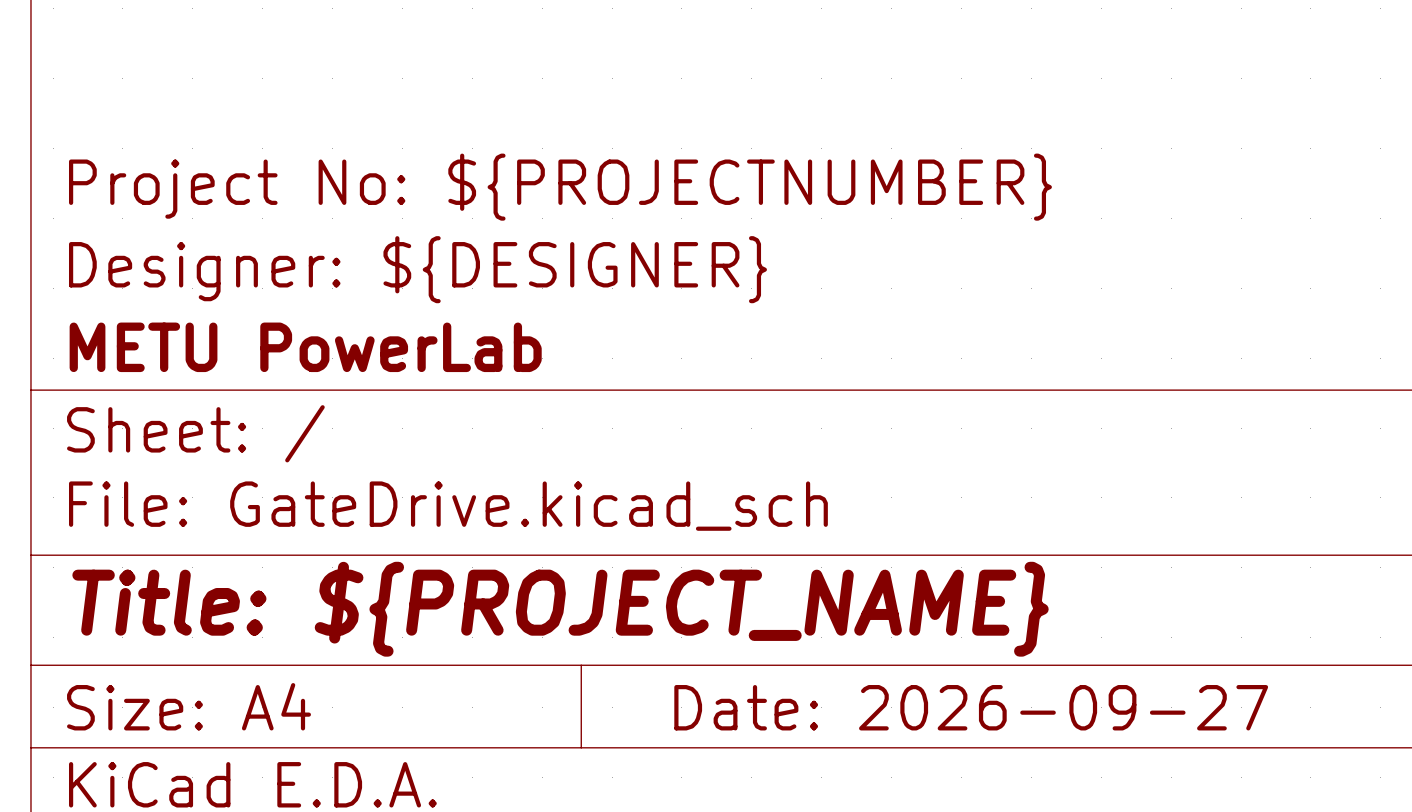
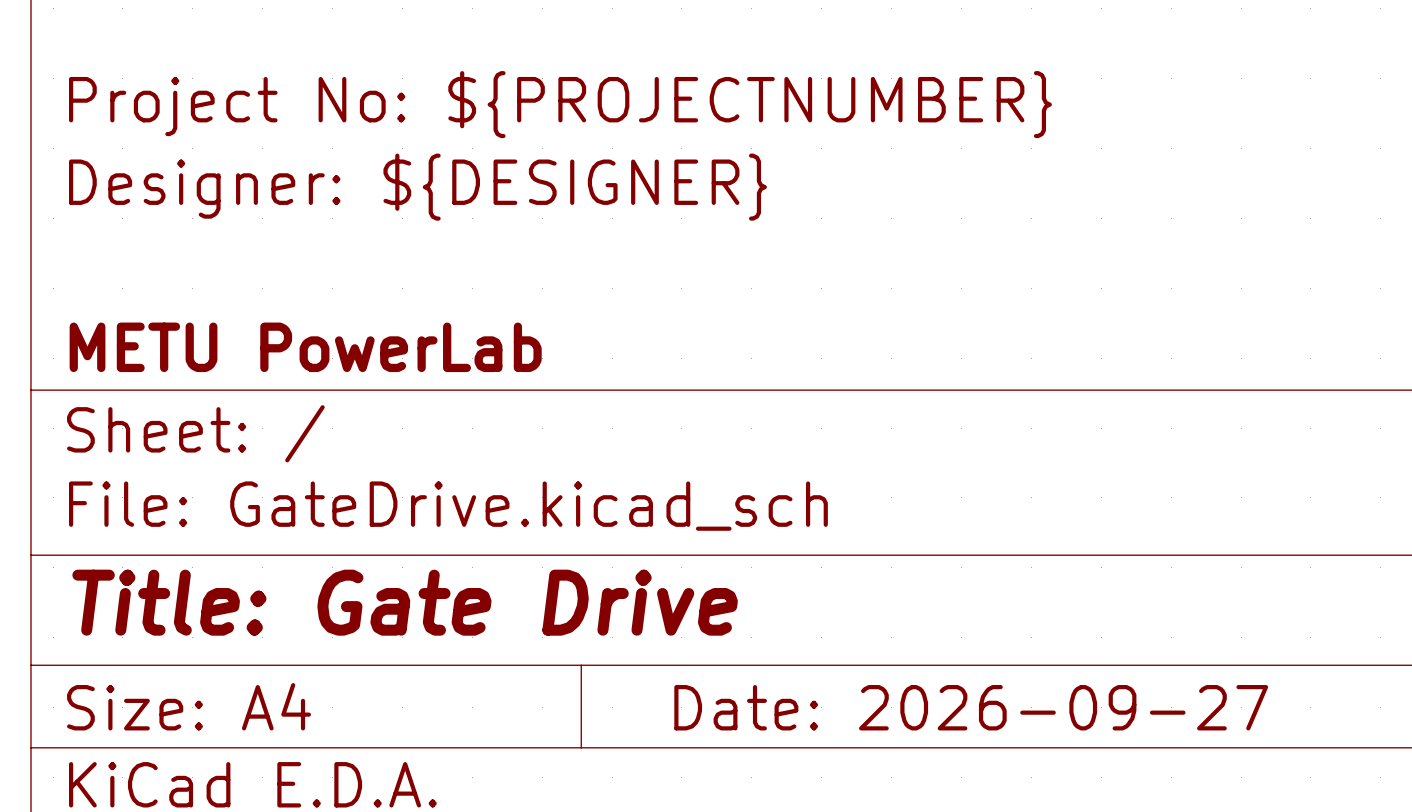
title block: none -> Project No: ${PROJECTNUMBER} (560, 104)
title block: Project No: ${PROJECTNUMBER} (560, 187) -> Designer: ${DESIGNER} (417, 187)
title block: Designer: ${DESIGNER} (417, 269) -> none
title block: Title: ${PROJECT_NAME} (560, 609) -> Title: Gate Drive (405, 602)

